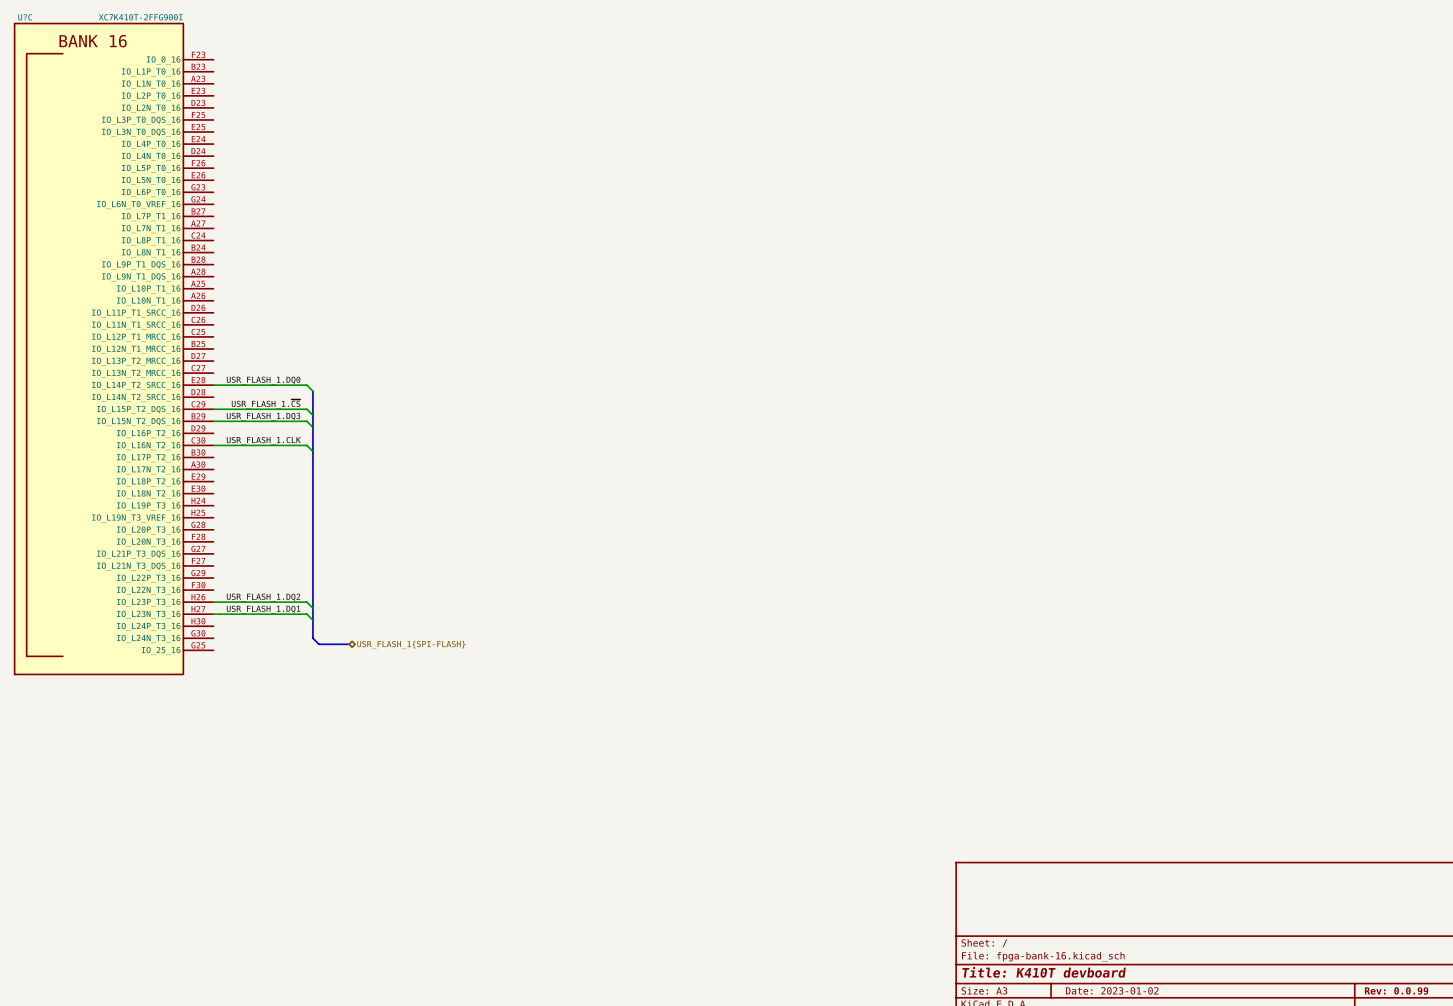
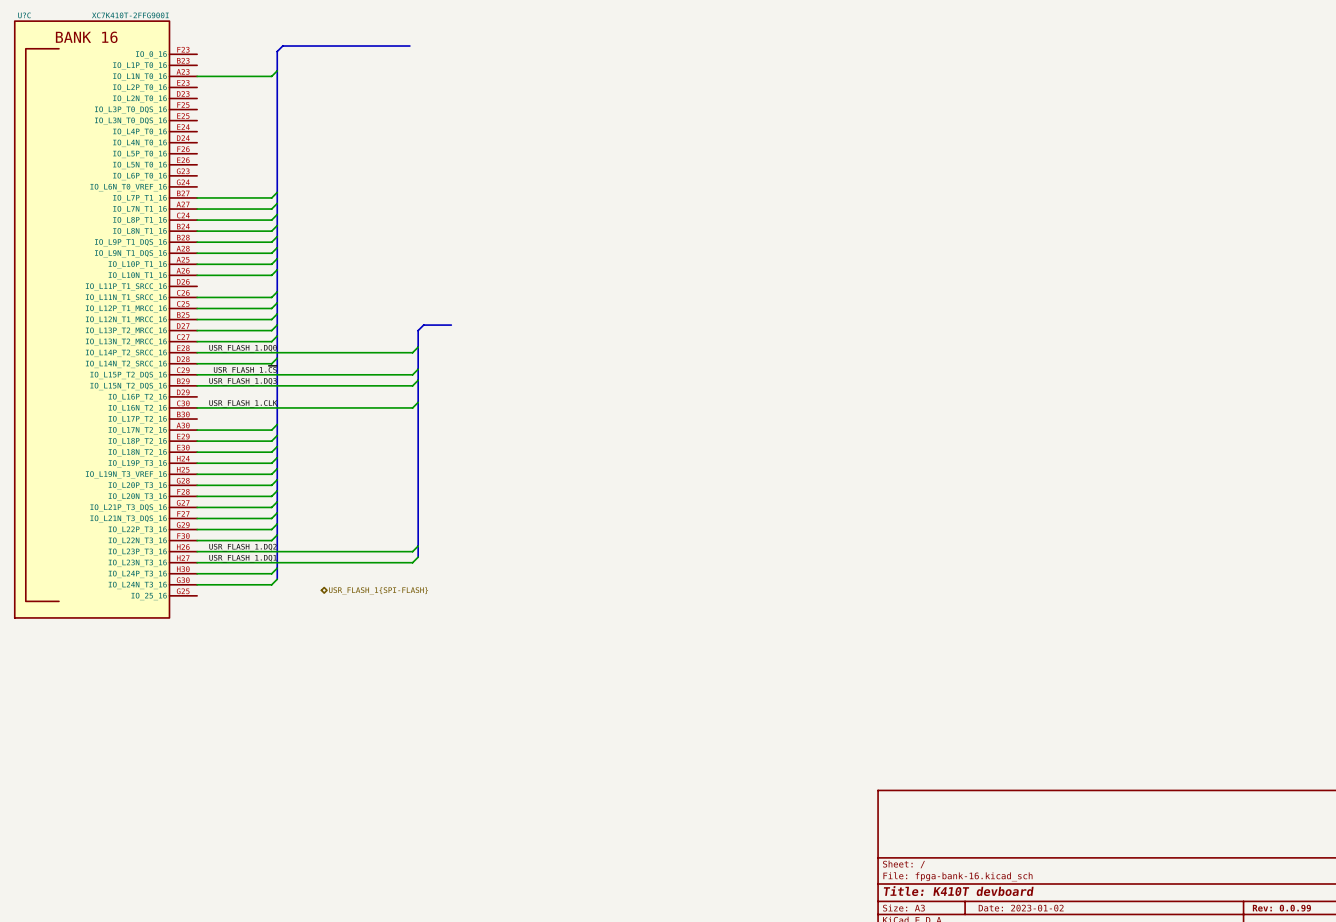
bus: none -> (409, 46) (282, 46) (277, 51) (277, 579)
wire: none -> (277, 70) (271, 76) (197, 76)
wire: none -> (277, 192) (271, 197) (197, 197)
wire: none -> (277, 203) (271, 209) (197, 209)
wire: none -> (277, 214) (271, 220) (197, 220)
wire: none -> (277, 225) (271, 231) (197, 231)
wire: none -> (277, 236) (271, 242) (197, 242)
wire: none -> (277, 247) (271, 253) (197, 253)
wire: none -> (277, 258) (271, 264) (197, 264)
wire: none -> (277, 269) (271, 275) (197, 275)
wire: none -> (277, 291) (271, 297) (197, 297)
wire: none -> (277, 302) (271, 308) (197, 308)
wire: none -> (277, 314) (271, 319) (197, 319)
wire: none -> (277, 325) (271, 330) (197, 330)
bus: none -> (451, 325) (423, 325) (418, 330) (418, 557)
wire: none -> (277, 336) (271, 341) (197, 341)
wire: (306, 385) (312, 391) -> (282, 352) (412, 352) (418, 347)
wire: none -> (277, 358) (271, 363) (197, 363)
bus: (312, 391) (312, 638) (318, 644) (349, 644) -> none
wire: (306, 409) (312, 415) -> (282, 374) (412, 374) (418, 369)
wire: (306, 421) (312, 427) -> (282, 385) (412, 385) (418, 380)
wire: (306, 445) (312, 451) -> (282, 407) (412, 407) (418, 402)
wire: none -> (277, 424) (271, 430) (197, 430)
wire: none -> (277, 435) (271, 441) (197, 441)
wire: none -> (277, 446) (271, 452) (197, 452)
wire: none -> (277, 457) (271, 463) (197, 463)
wire: none -> (277, 468) (271, 474) (197, 474)
wire: none -> (277, 479) (271, 485) (197, 485)
wire: none -> (277, 490) (271, 496) (197, 496)
wire: none -> (277, 501) (271, 507) (197, 507)
wire: none -> (277, 512) (271, 518) (197, 518)
wire: none -> (277, 524) (271, 529) (197, 529)
wire: none -> (277, 535) (271, 540) (197, 540)
wire: (306, 602) (312, 608) -> (282, 551) (412, 551) (418, 546)
wire: (306, 614) (312, 620) -> (282, 562) (412, 562) (418, 557)
wire: none -> (277, 568) (271, 573) (197, 573)
wire: none -> (277, 579) (271, 584) (197, 584)

